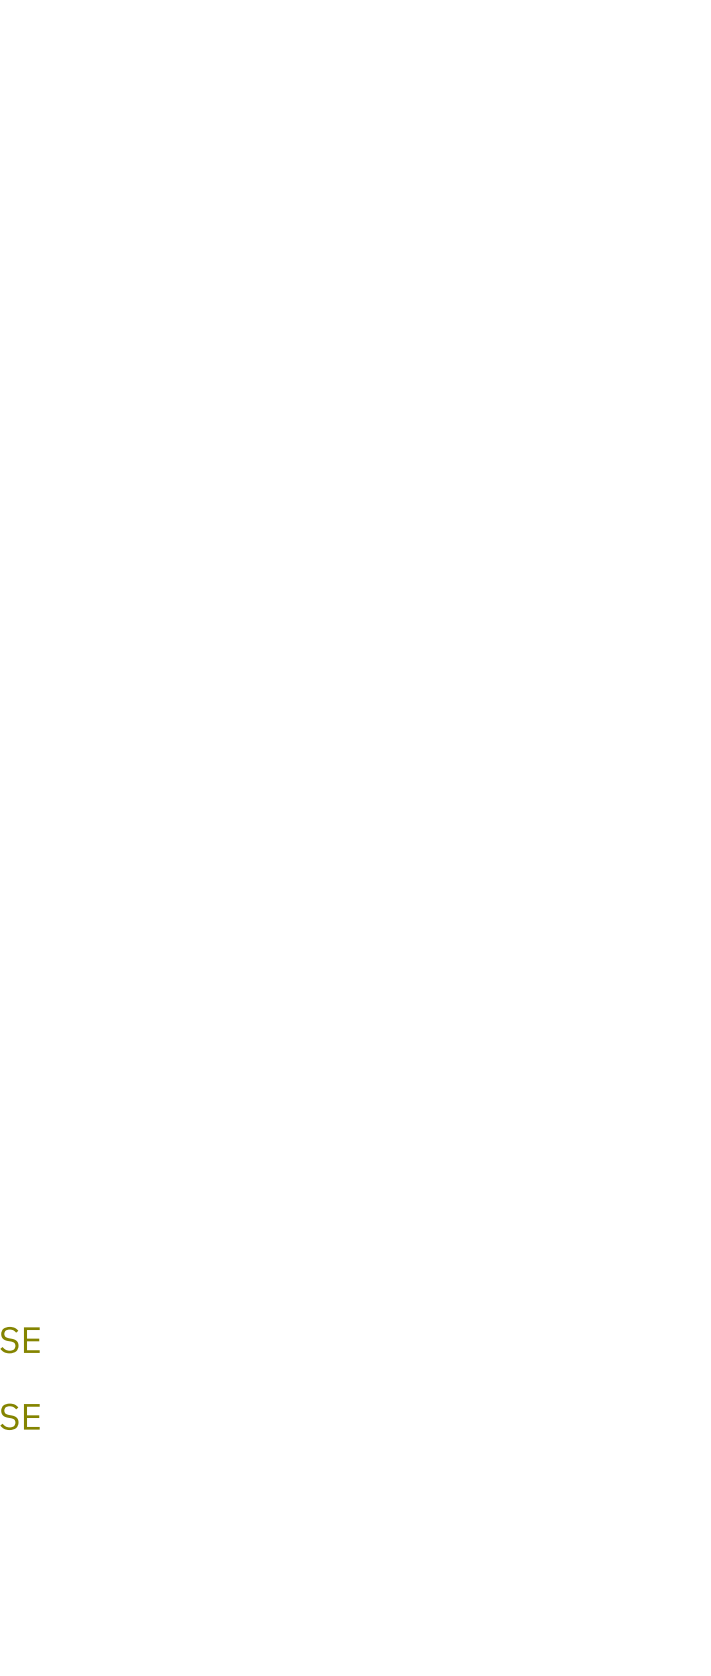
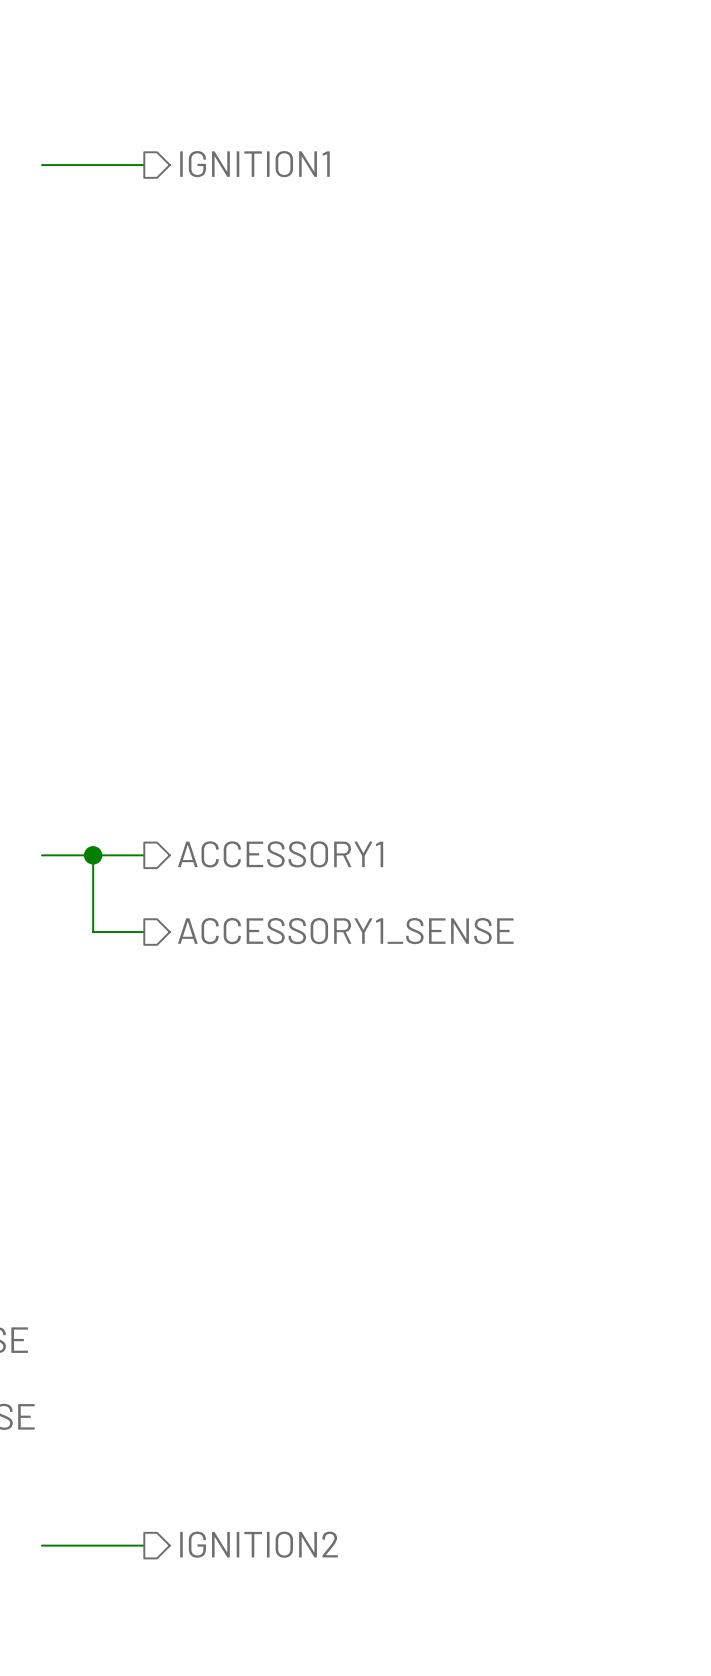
hierarchical label: none -> IGNITION1 (254, 164)
wire: none -> (42, 165) (144, 165)
hierarchical label: none -> ACCESSORY1 (280, 854)
wire: none -> (42, 855) (144, 855)
wire: none -> (93, 855) (93, 932) (144, 932)
junction: none -> (93, 855)
hierarchical label: none -> ACCESSORY1_SENSE (345, 931)
hierarchical label: none -> IGNITION2 (259, 1544)
wire: none -> (42, 1545) (144, 1545)

